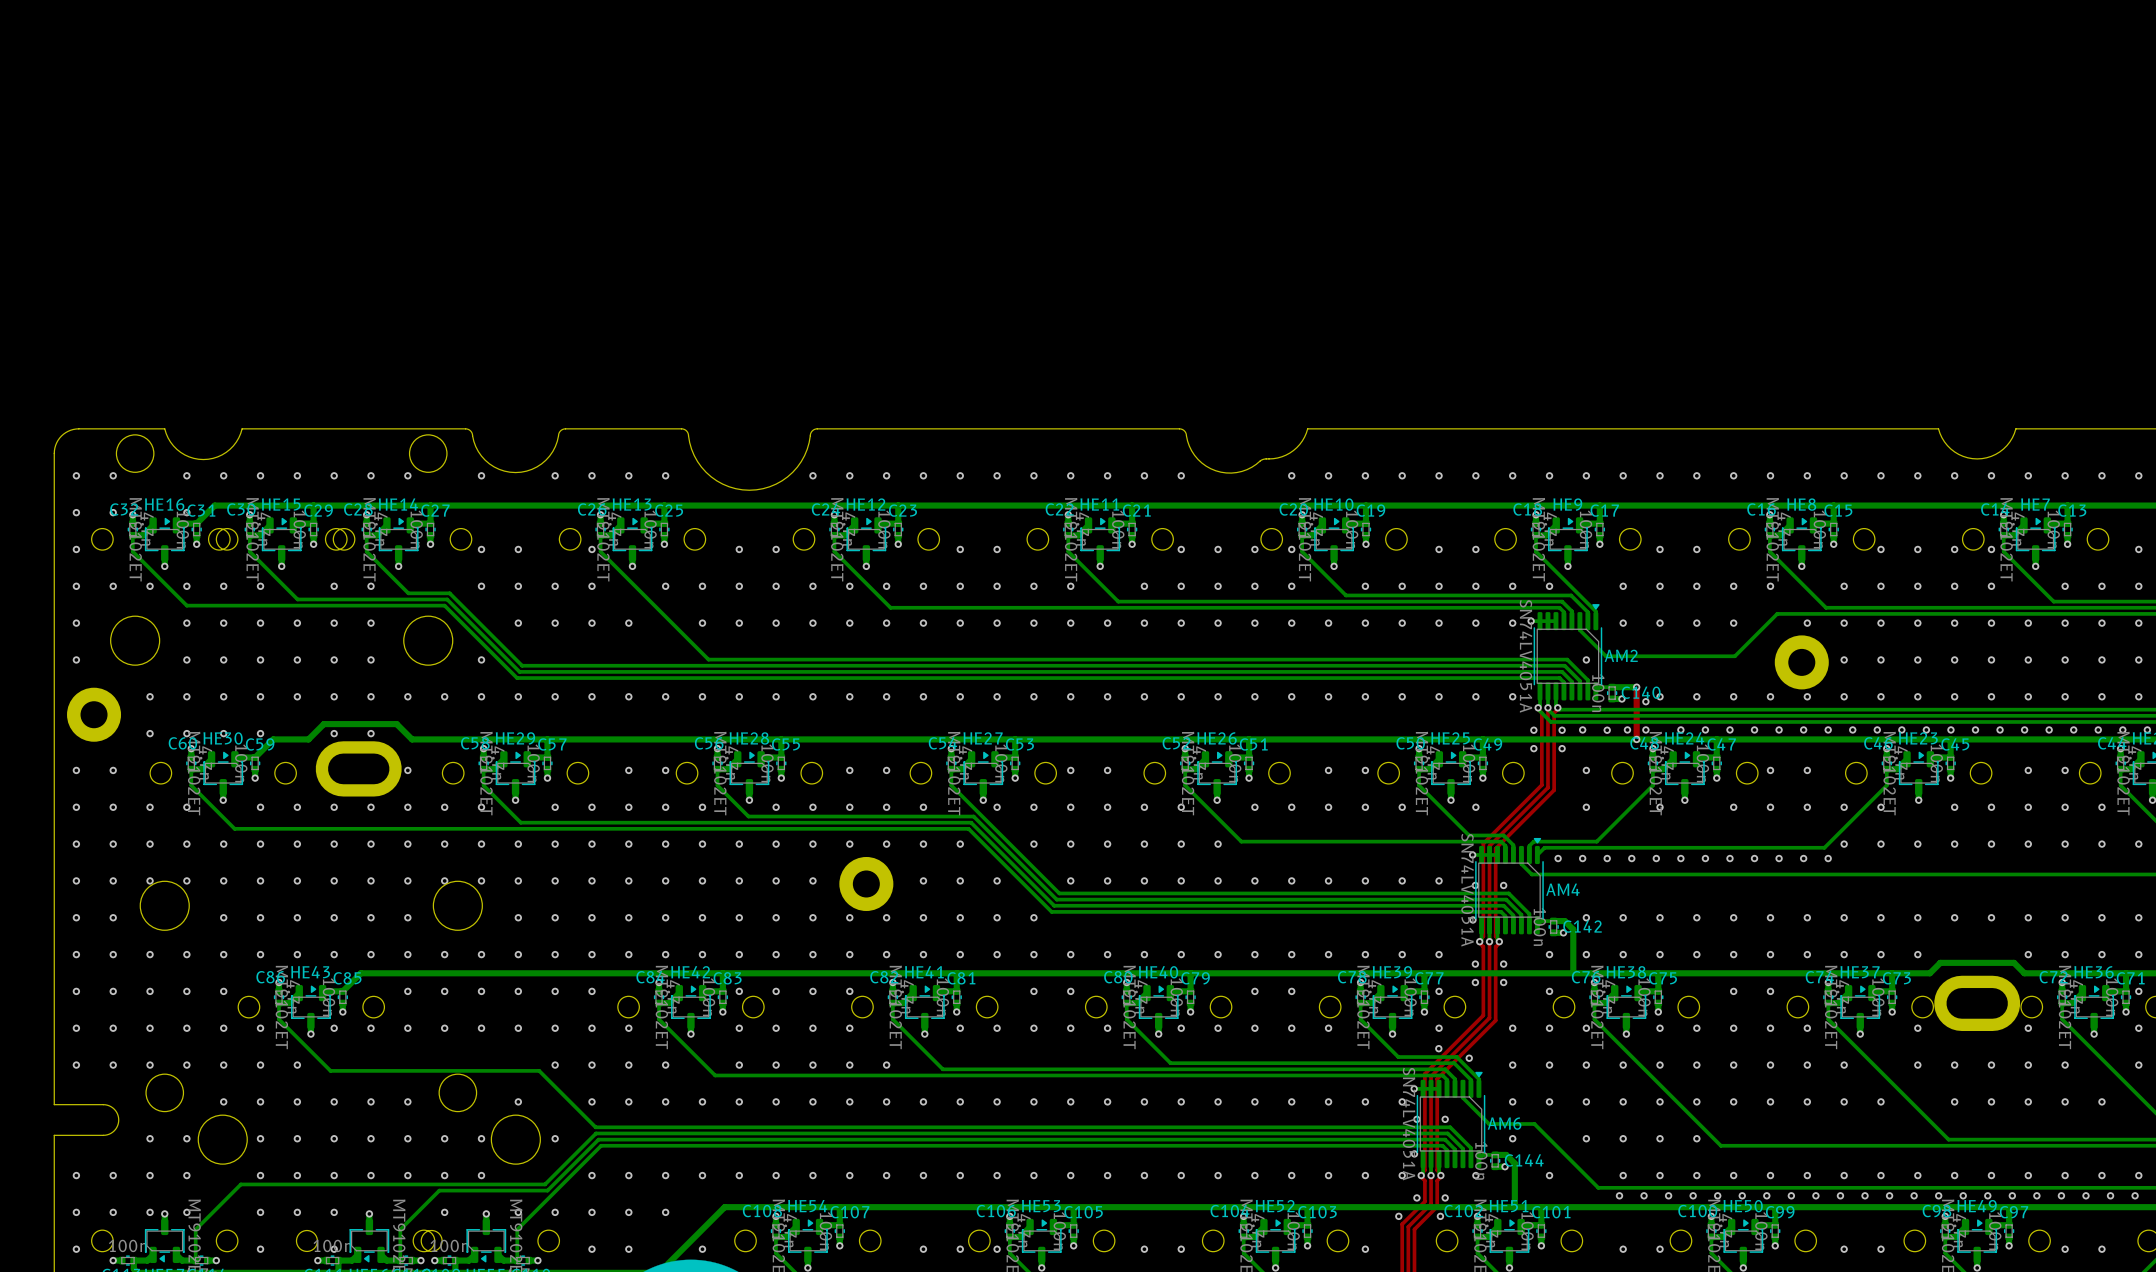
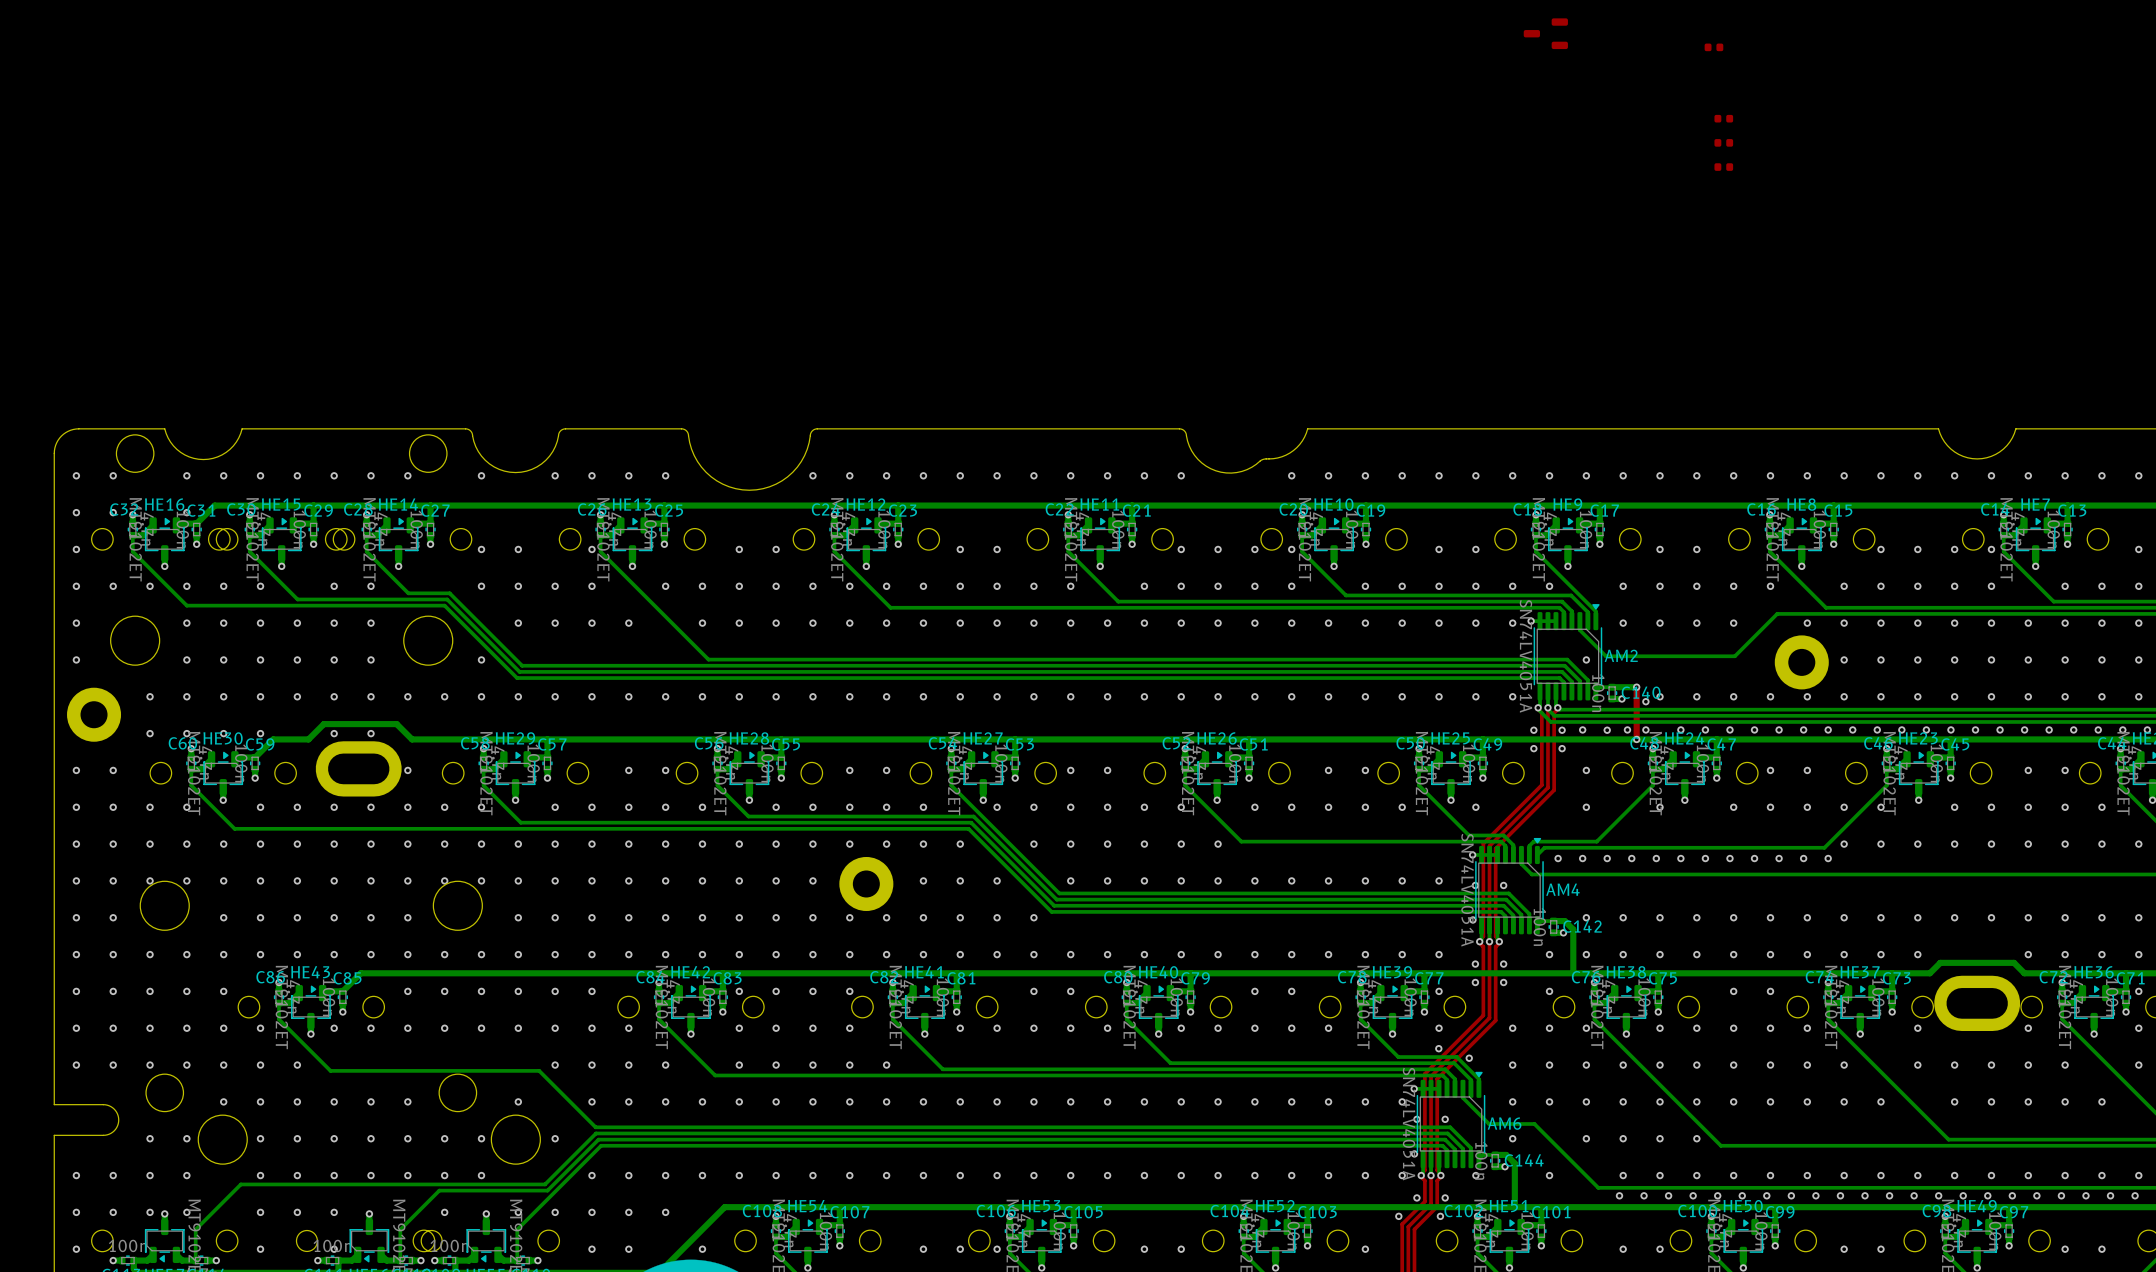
part: none -> (1545, 33)
part: none -> (1713, 47)
part: none -> (1723, 118)
part: none -> (1723, 142)
part: none -> (1723, 167)

